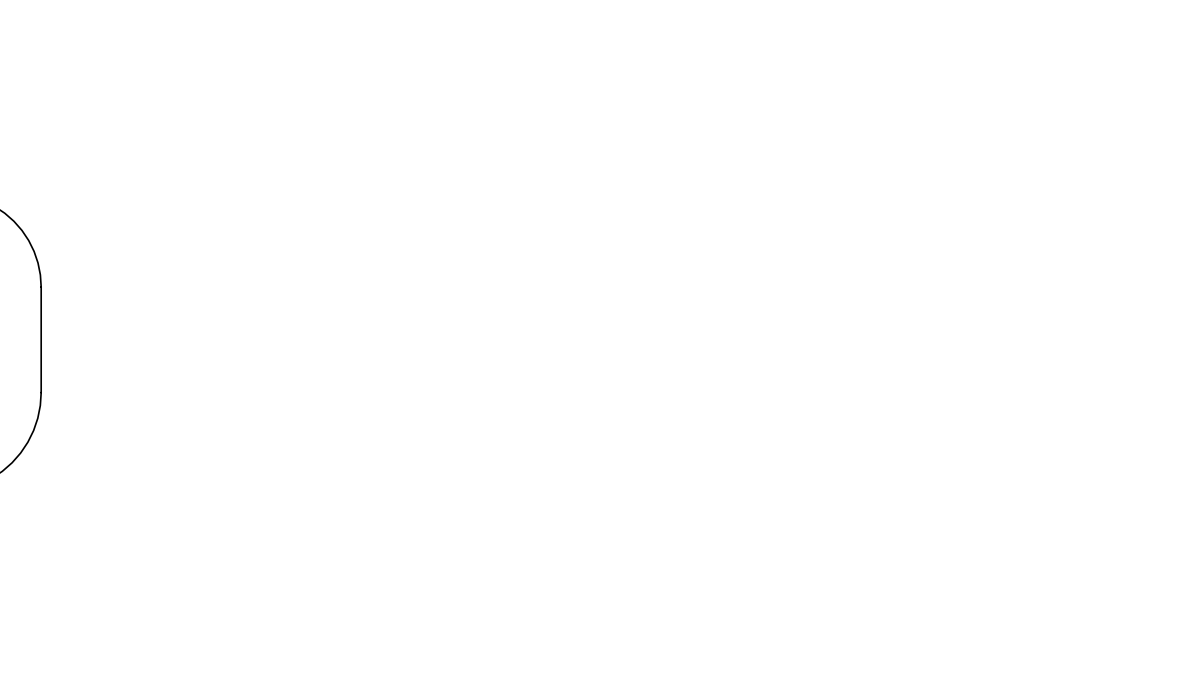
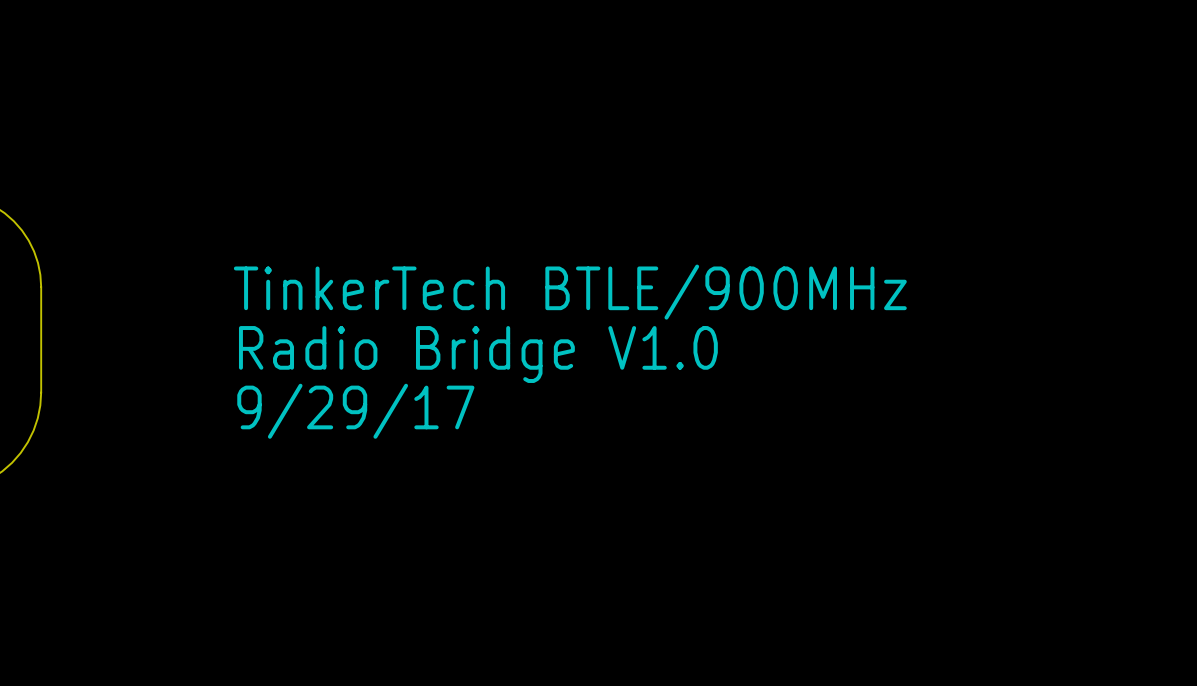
text: none -> TinkerTech BTLE/900MHz (570, 292)
text: none -> Radio Bridge V1.0 (478, 354)
text: none -> 9/29/17 (355, 411)

